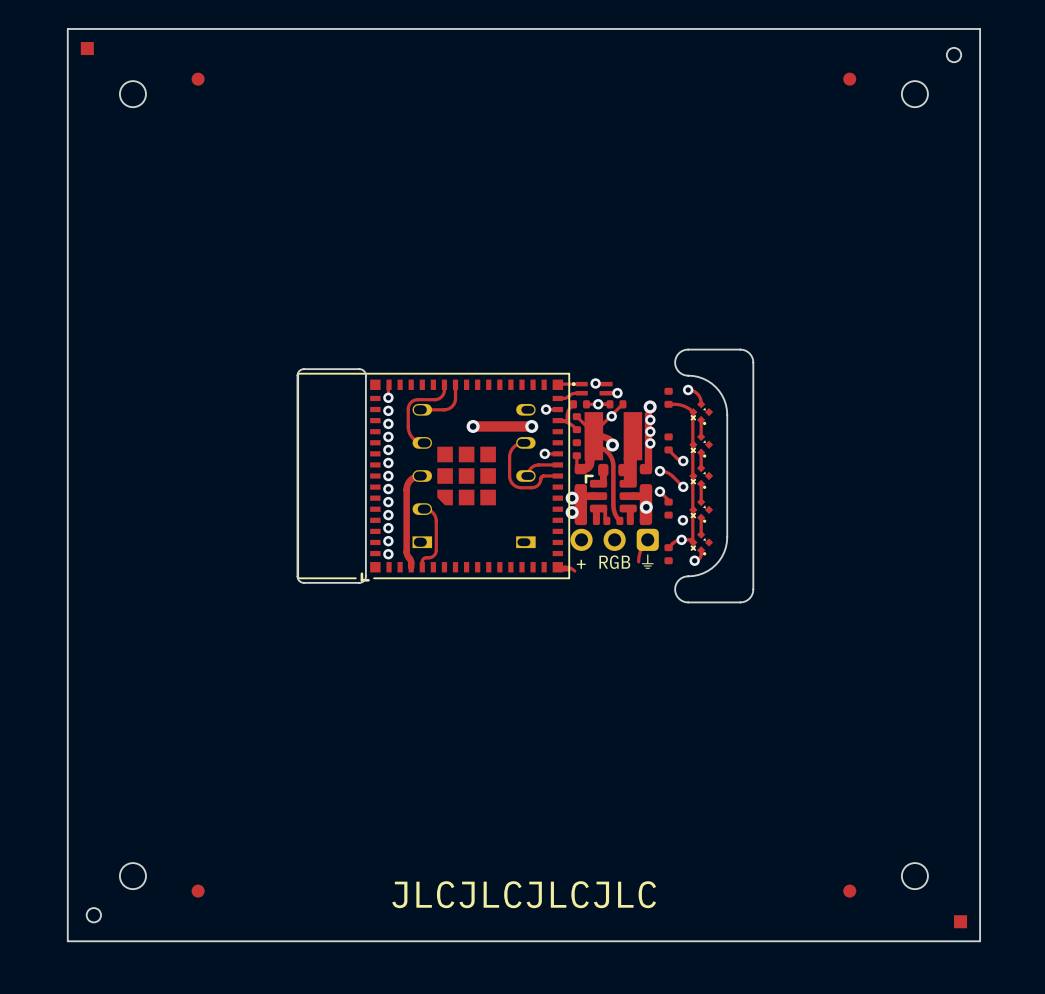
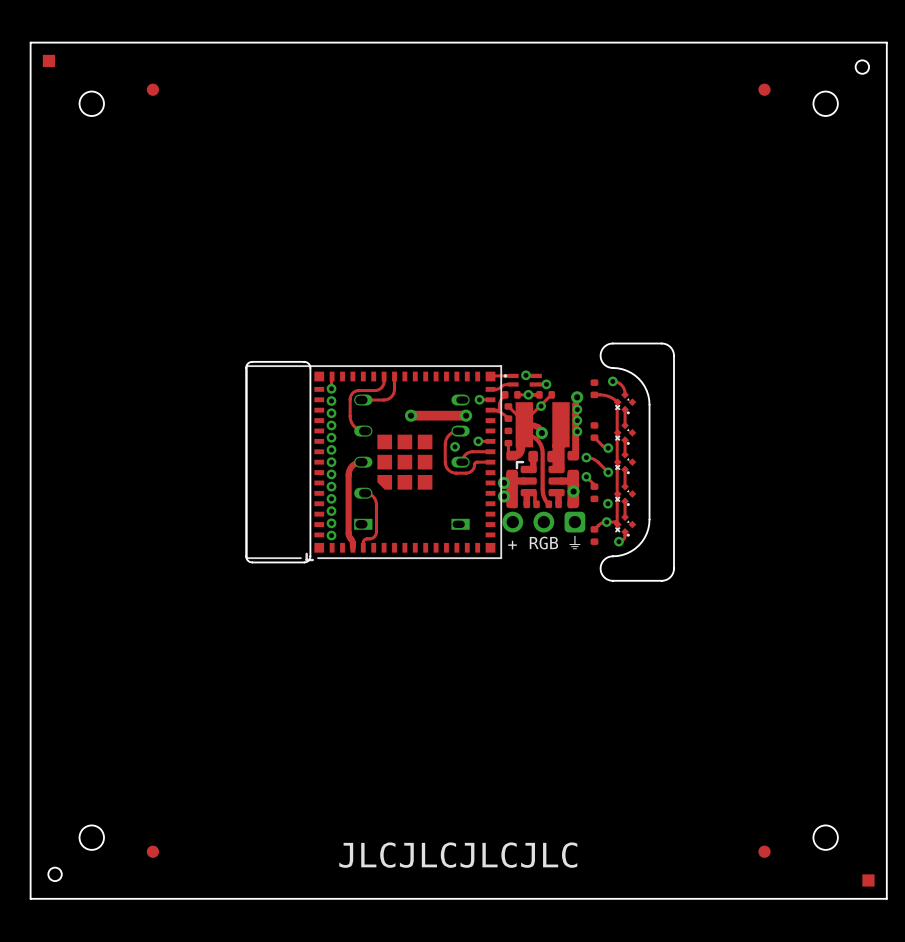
via: none -> (455, 446)
track: (647, 539) (641, 549) (638, 561) -> none
track: (568, 569) (557, 567) (567, 567) (574, 571) -> none

